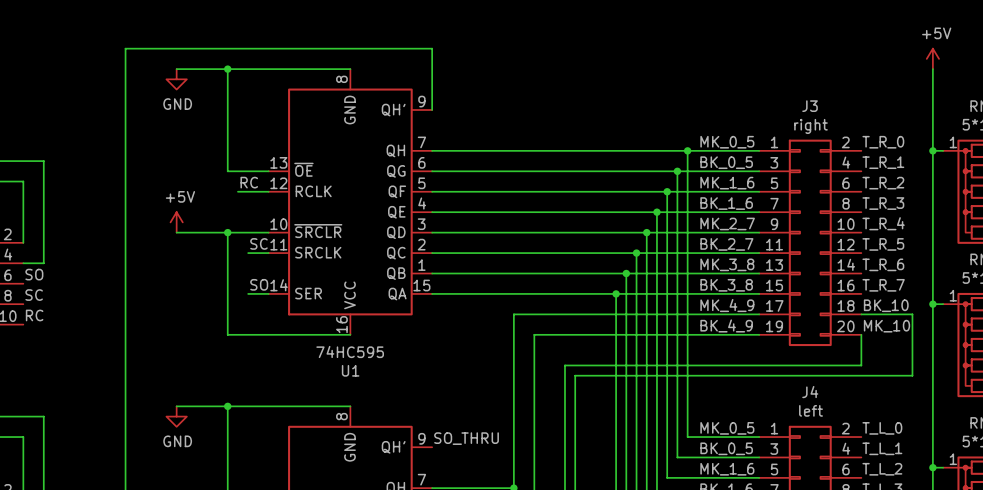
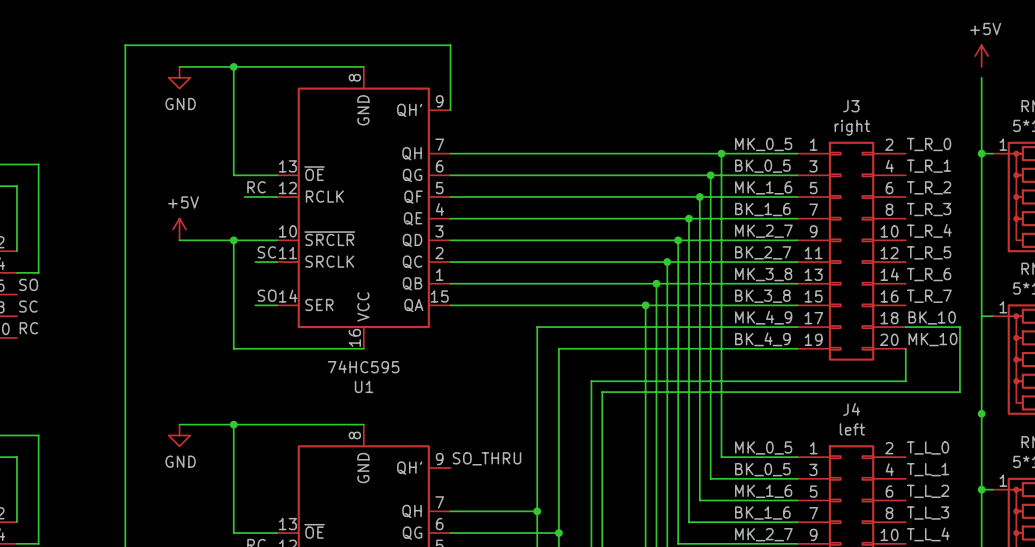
wire: (932, 69) (932, 79) -> none
junction: (932, 304) -> none
junction: none -> (981, 413)

